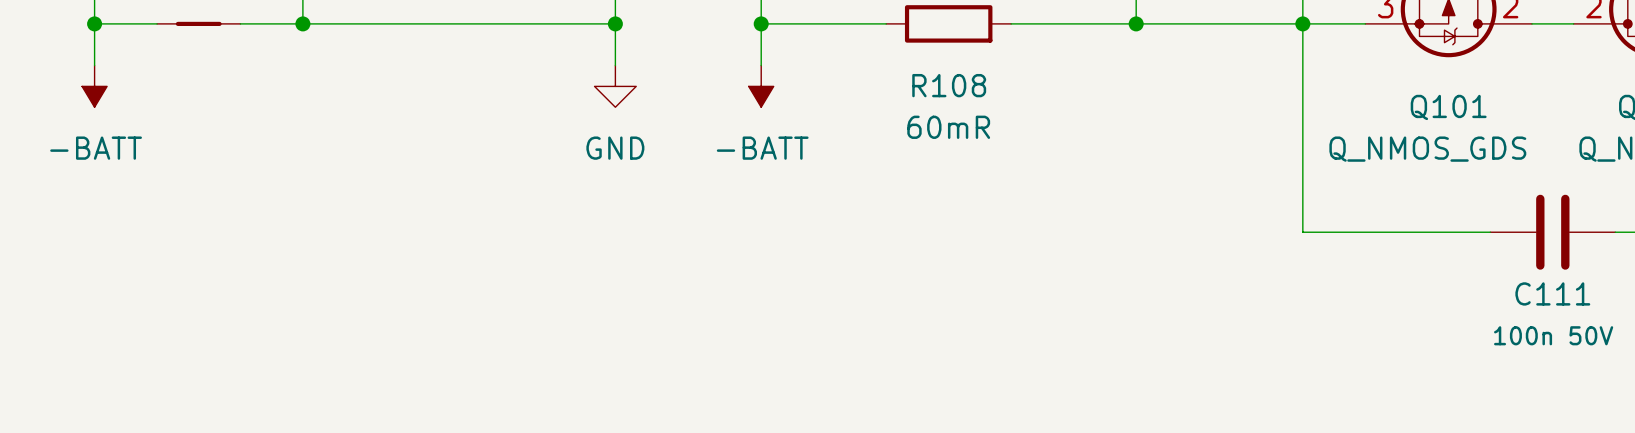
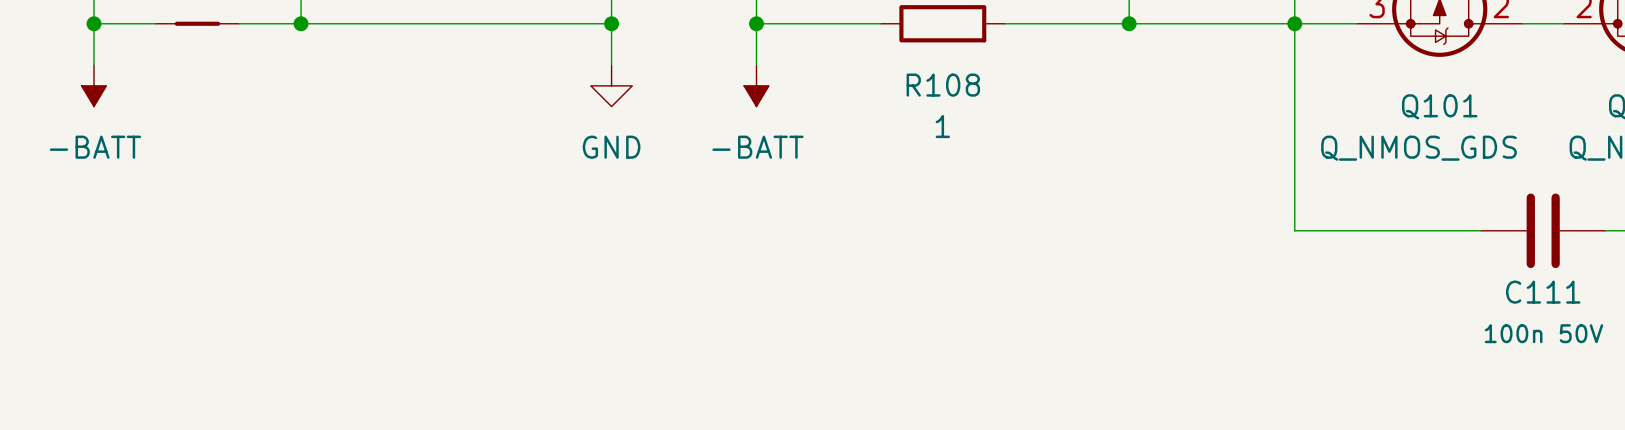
R108 value: 60mR (948, 127) -> 1 (942, 126)

